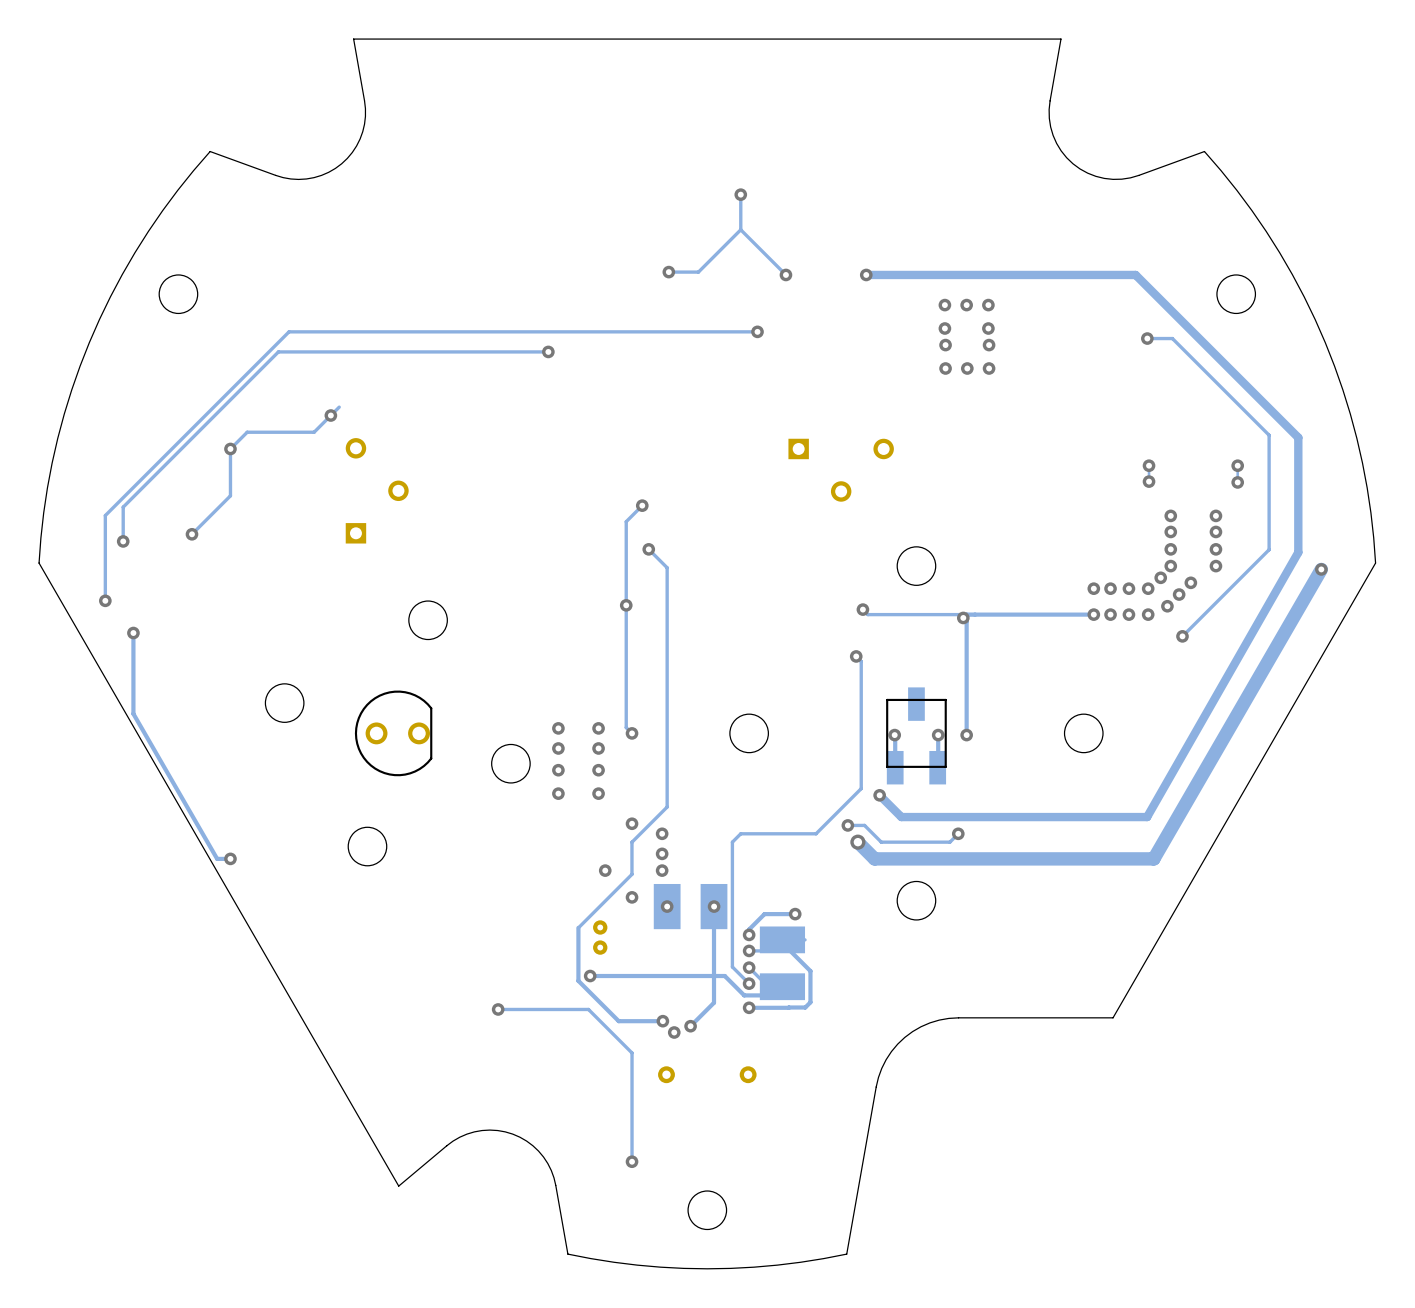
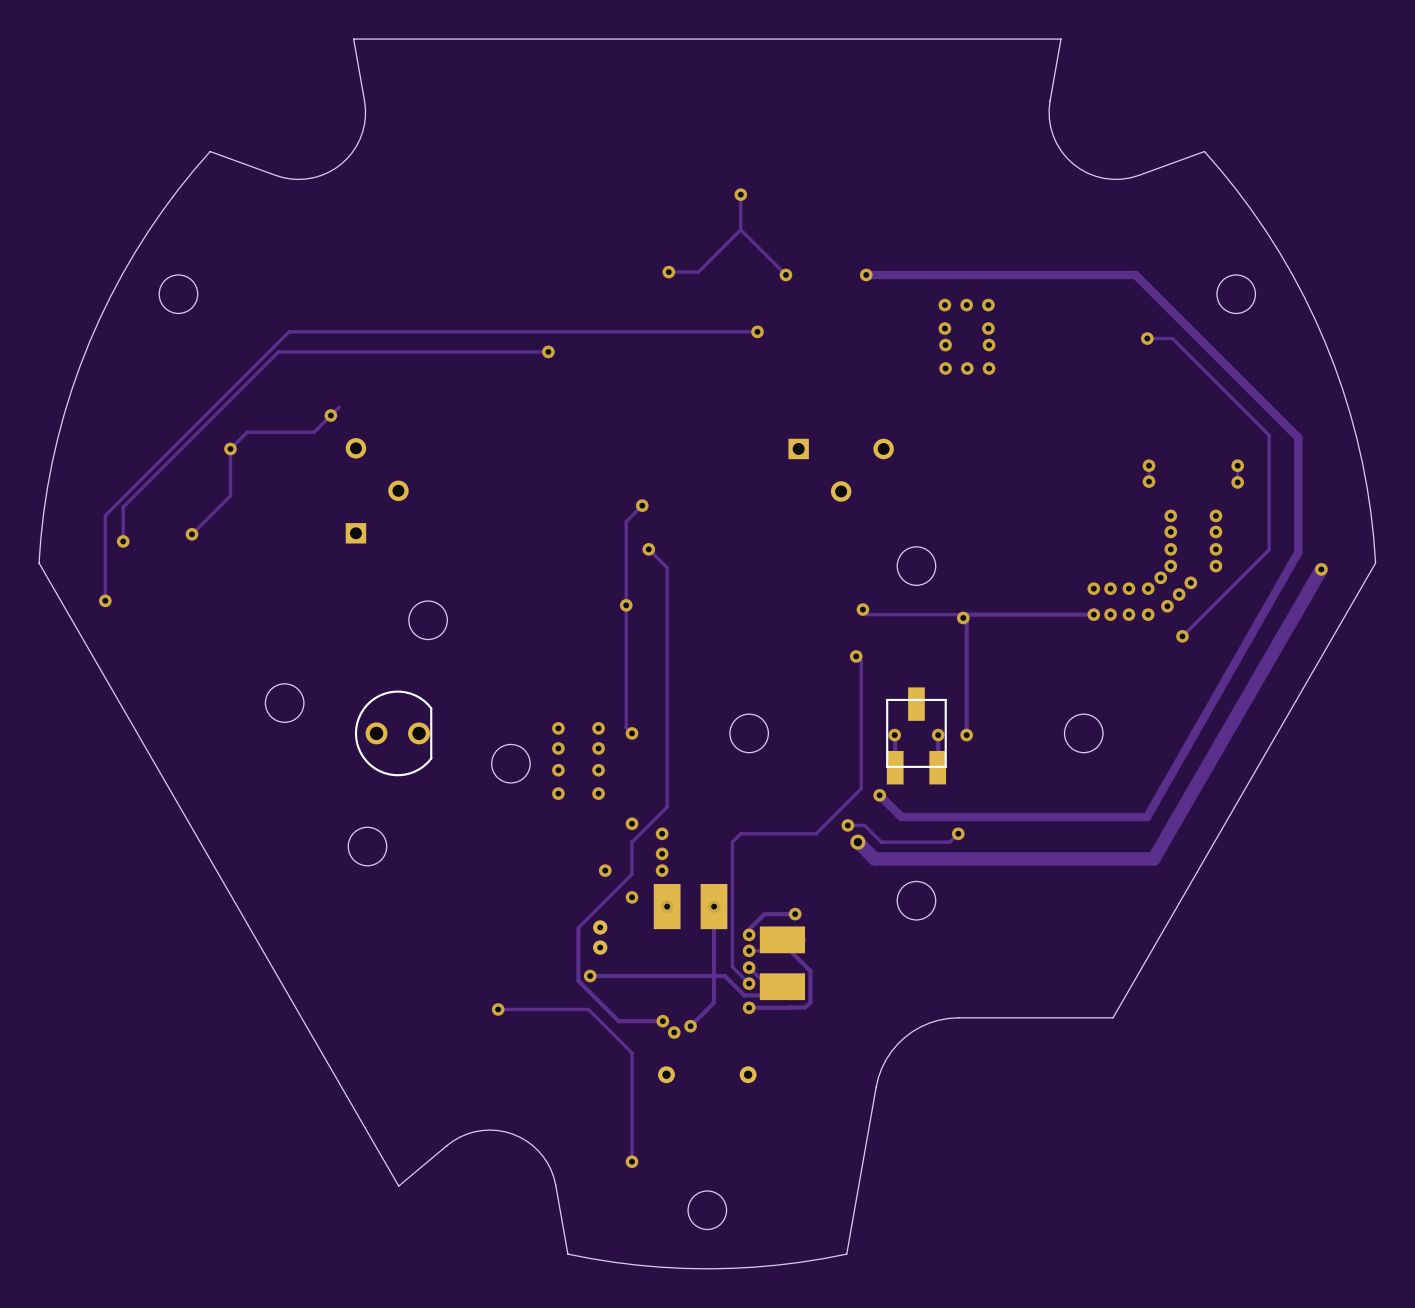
track: (133, 633) (133, 713) (217, 858) (230, 858) -> none
via: (133, 633) -> none
via: (230, 858) -> none

